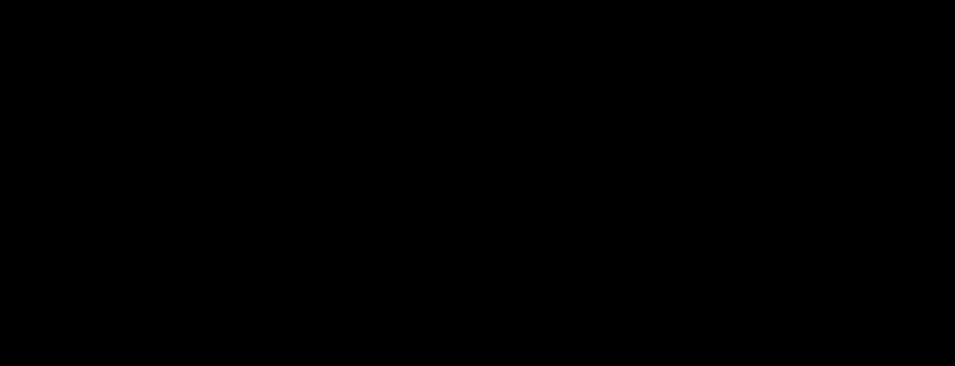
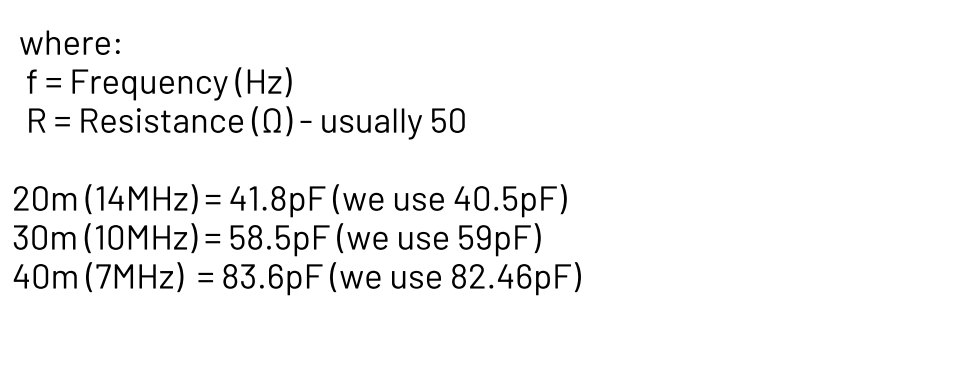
text: none -> where: (69, 42)
text: none -> f = Frequency (Hz) (159, 83)
text: none -> R = Resistance (Ω) - usually 50 (246, 122)
text: none -> 20m (14MHz) = 41.8pF (we use 40.5pF) (290, 200)
text: none -> 30m (10MHz) = 58.5pF (we use 59pF) (277, 239)
text: none -> 40m (7MHz) = 83.6pF (we use 82.46pF) (297, 278)

